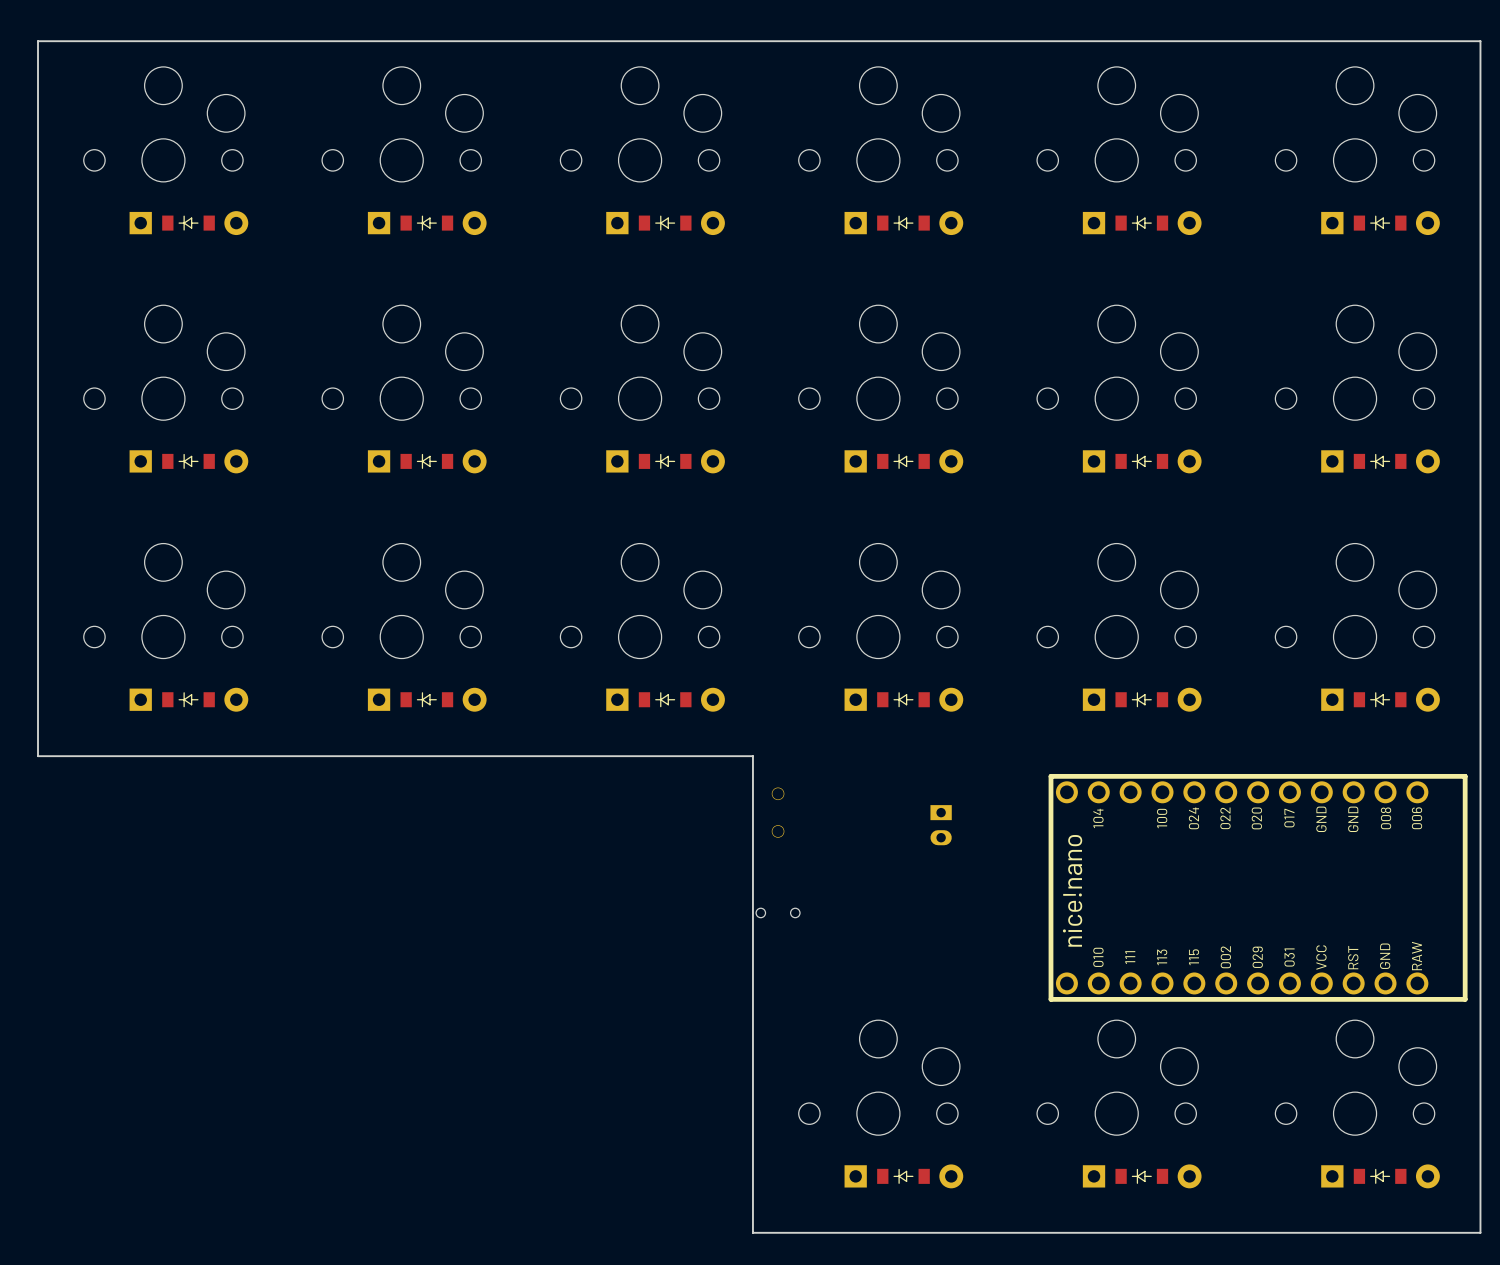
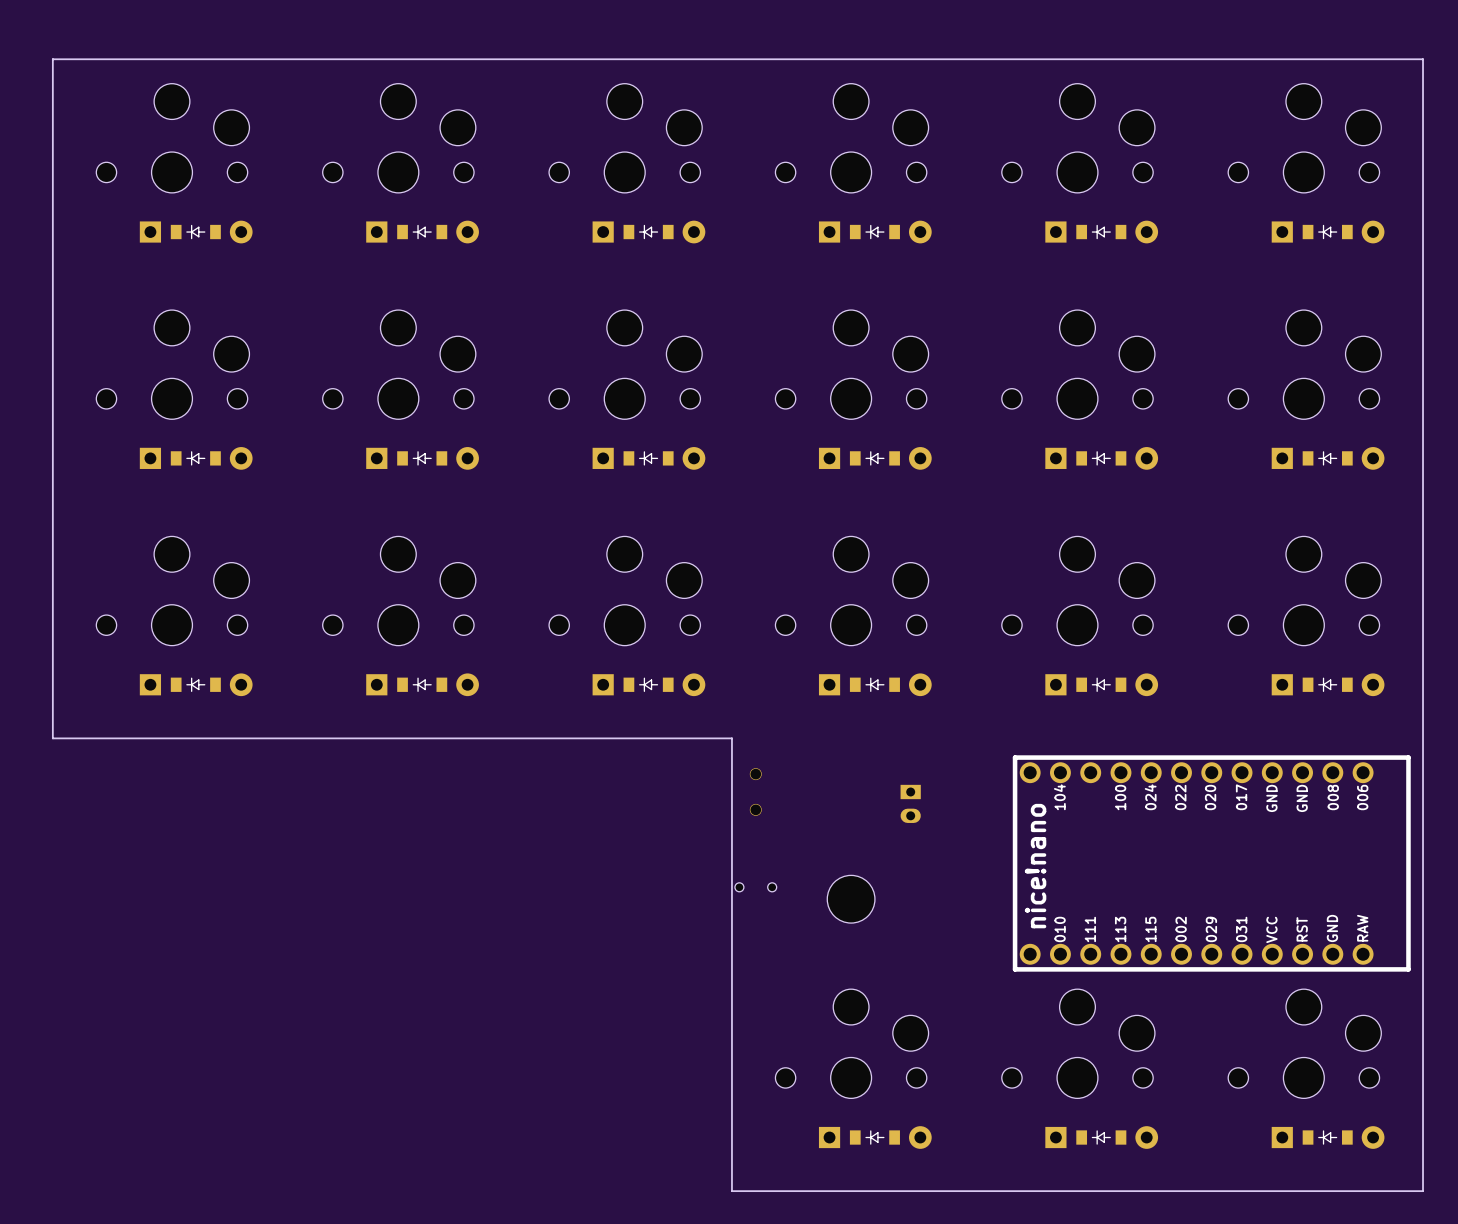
part: none -> (851, 899)

